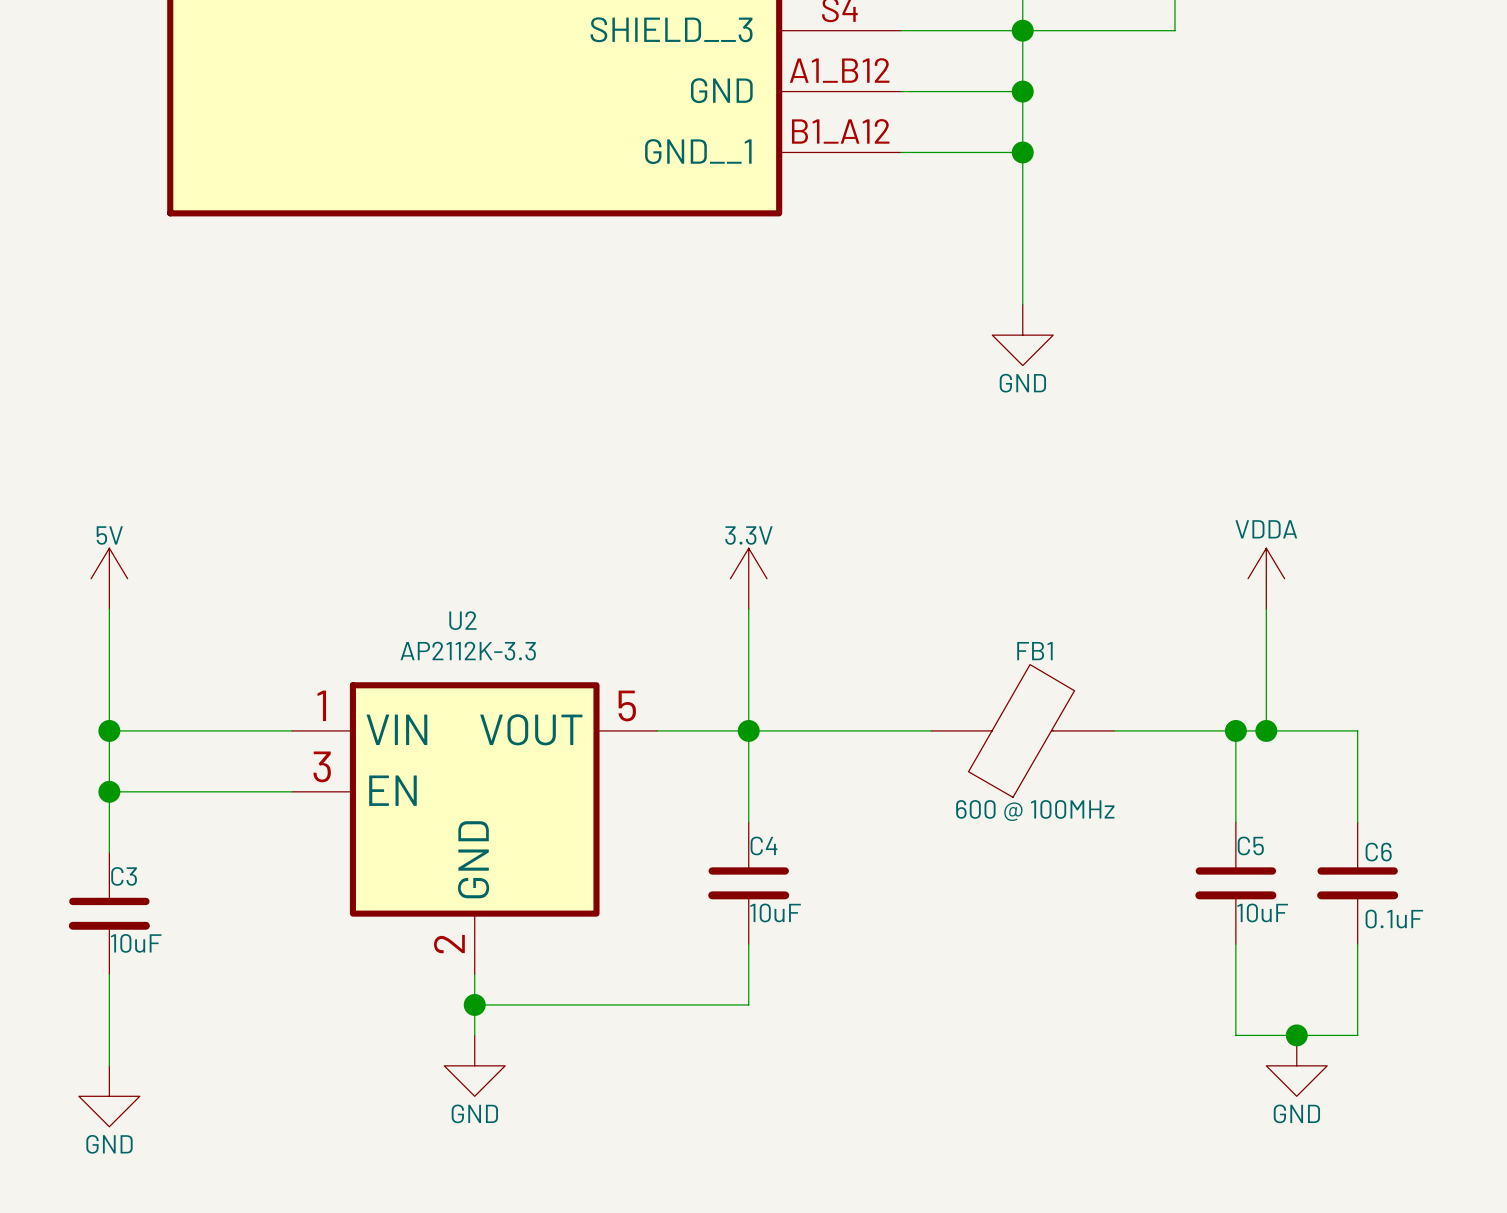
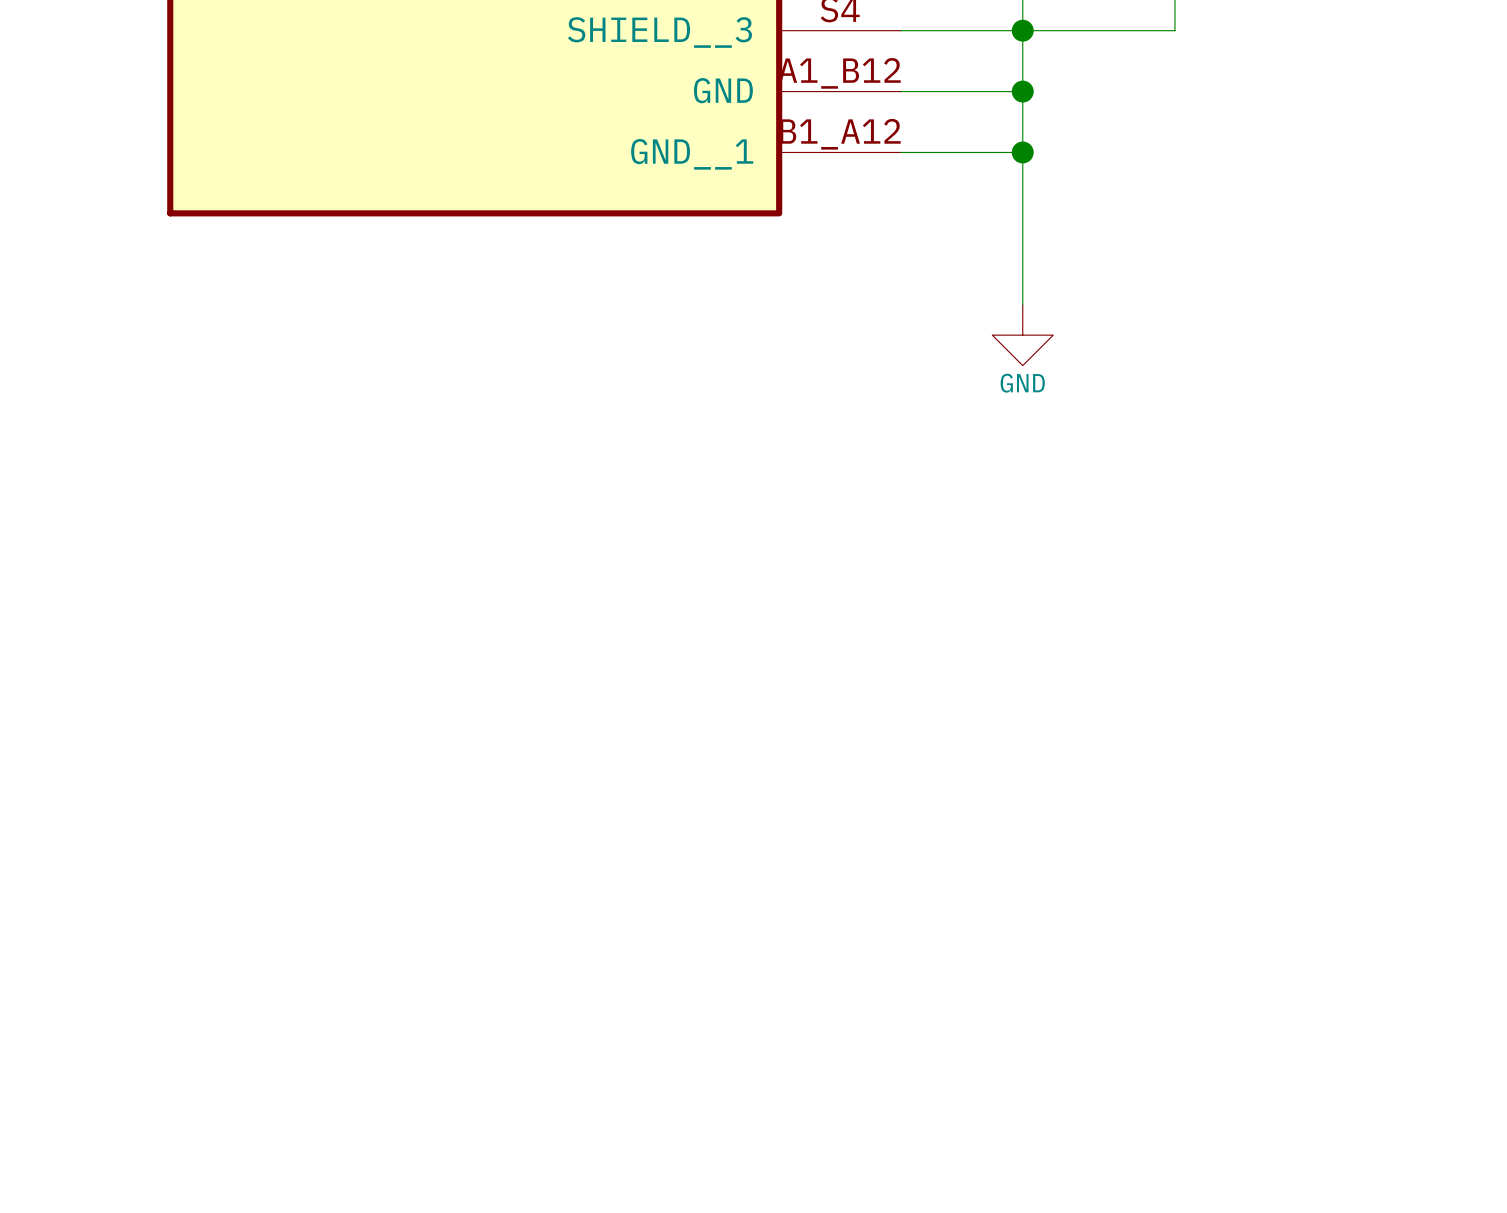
power symbol: 5V (109, 578) -> none
power symbol: 3.3V (748, 578) -> none
power symbol: VDDA (1266, 578) -> none
wire: (109, 609) (109, 852) -> none
wire: (748, 609) (748, 822) -> none
wire: (1266, 609) (1266, 730) -> none
wire: (109, 730) (292, 730) -> none
junction: (109, 730) -> none
wire: (657, 730) (931, 730) -> none
junction: (748, 730) -> none
FB1: 600 @ 100MHz (1022, 730) -> none
wire: (1114, 730) (1357, 730) (1357, 822) -> none
wire: (1235, 730) (1235, 822) -> none
junction: (1235, 730) -> none
junction: (1266, 730) -> none
wire: (109, 791) (292, 791) -> none
junction: (109, 791) -> none
U2: AP2112K-3.3 (474, 828) -> none
C4: 10uF (748, 883) -> none
C5: 10uF (1235, 883) -> none
C6: 0.1uF (1357, 883) -> none
C3: 10uF (109, 913) -> none
wire: (748, 944) (748, 1004) (474, 1004) -> none
wire: (1235, 944) (1235, 1035) (1357, 1035) (1357, 944) -> none
wire: (109, 974) (109, 1065) -> none
wire: (474, 974) (474, 1035) -> none
junction: (474, 1004) -> none
junction: (1296, 1035) -> none
power symbol: GND (474, 1065) -> none
power symbol: GND (1296, 1065) -> none
power symbol: GND (109, 1096) -> none

